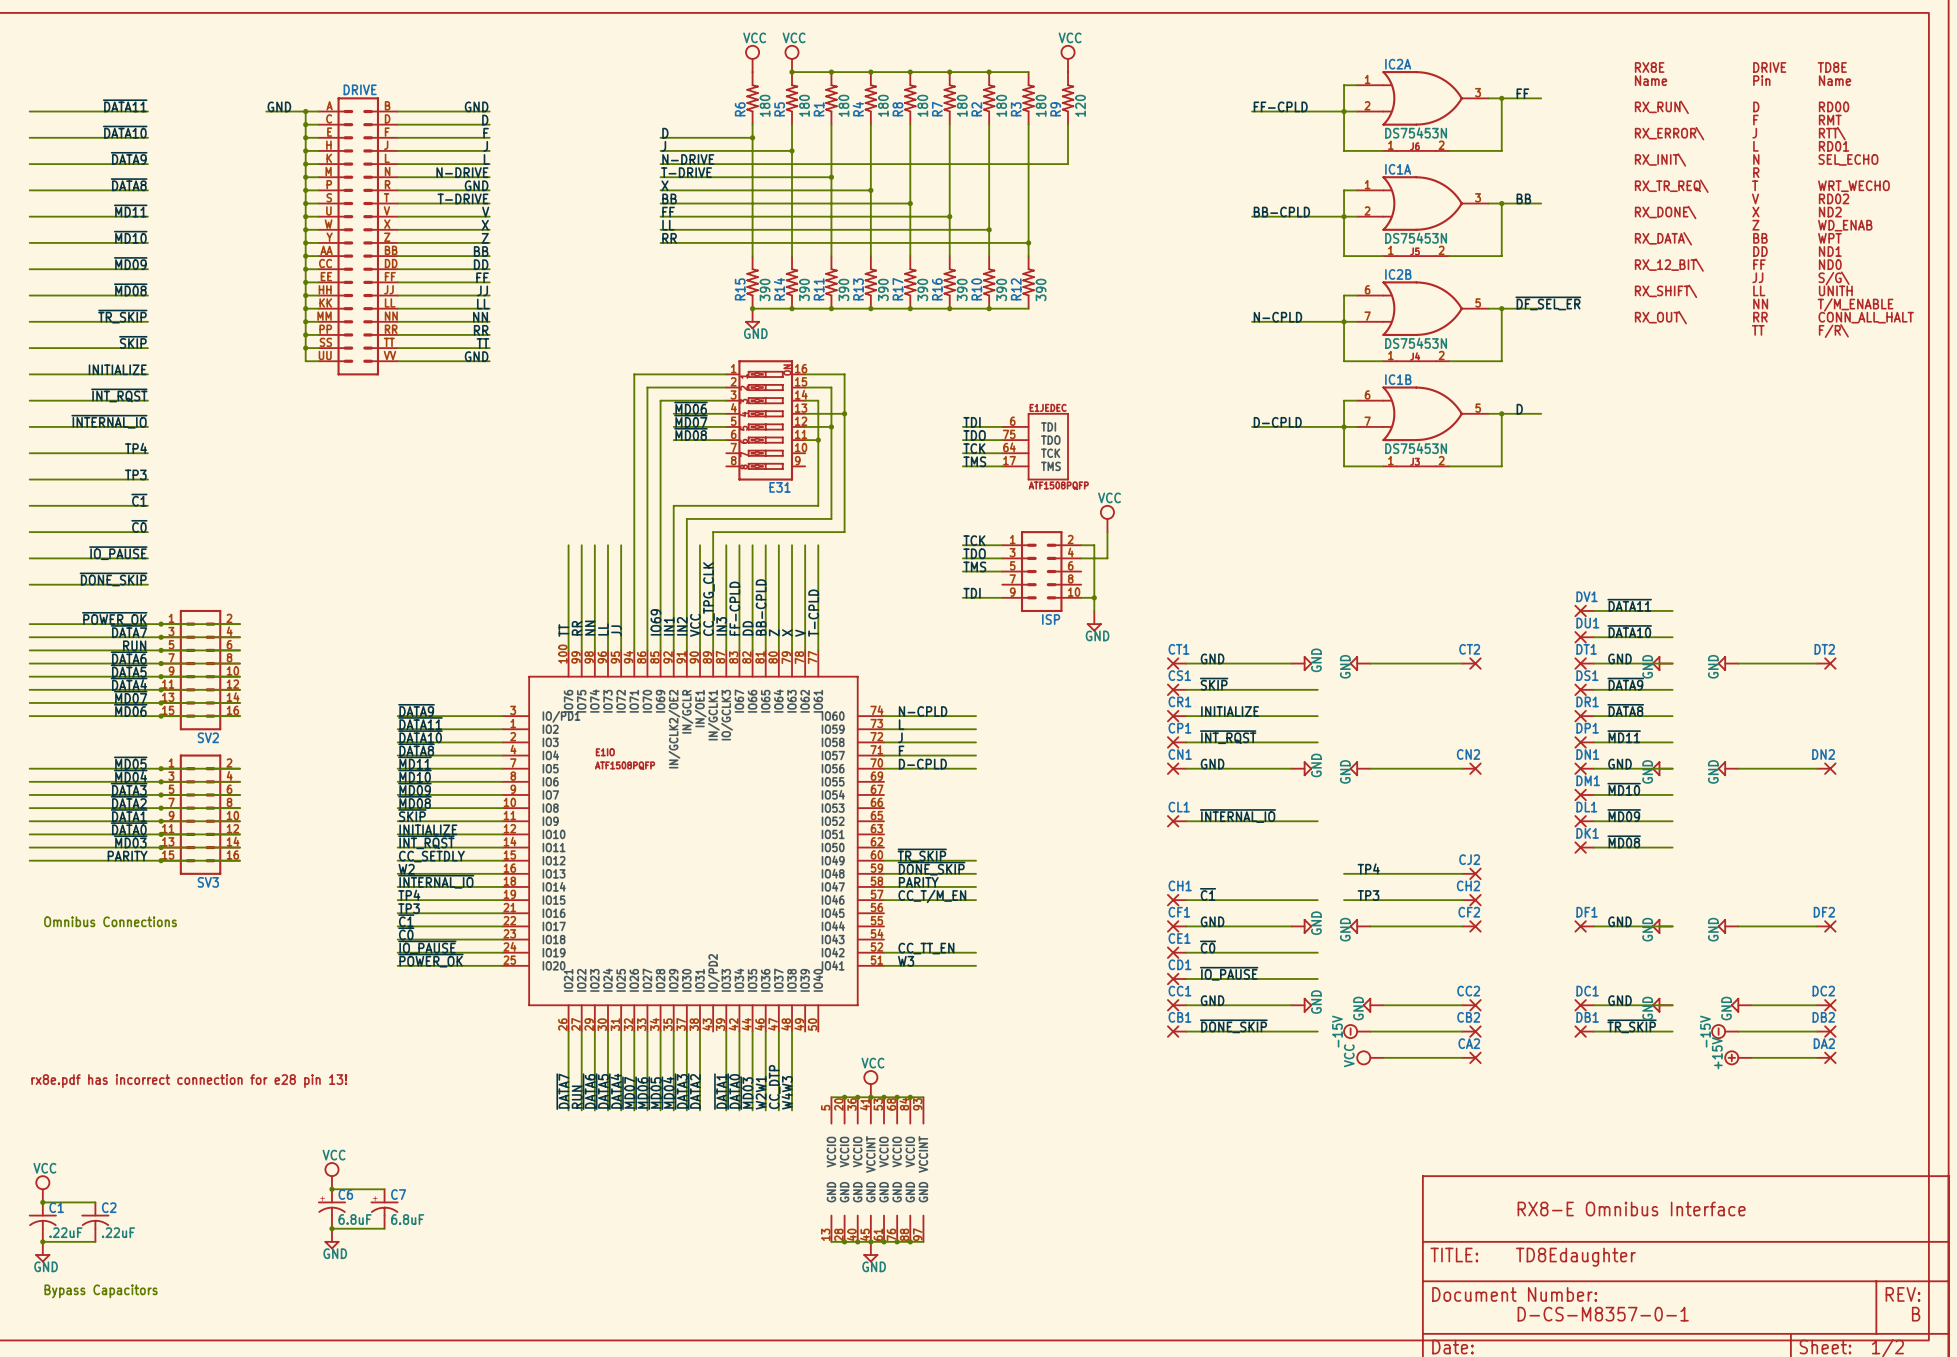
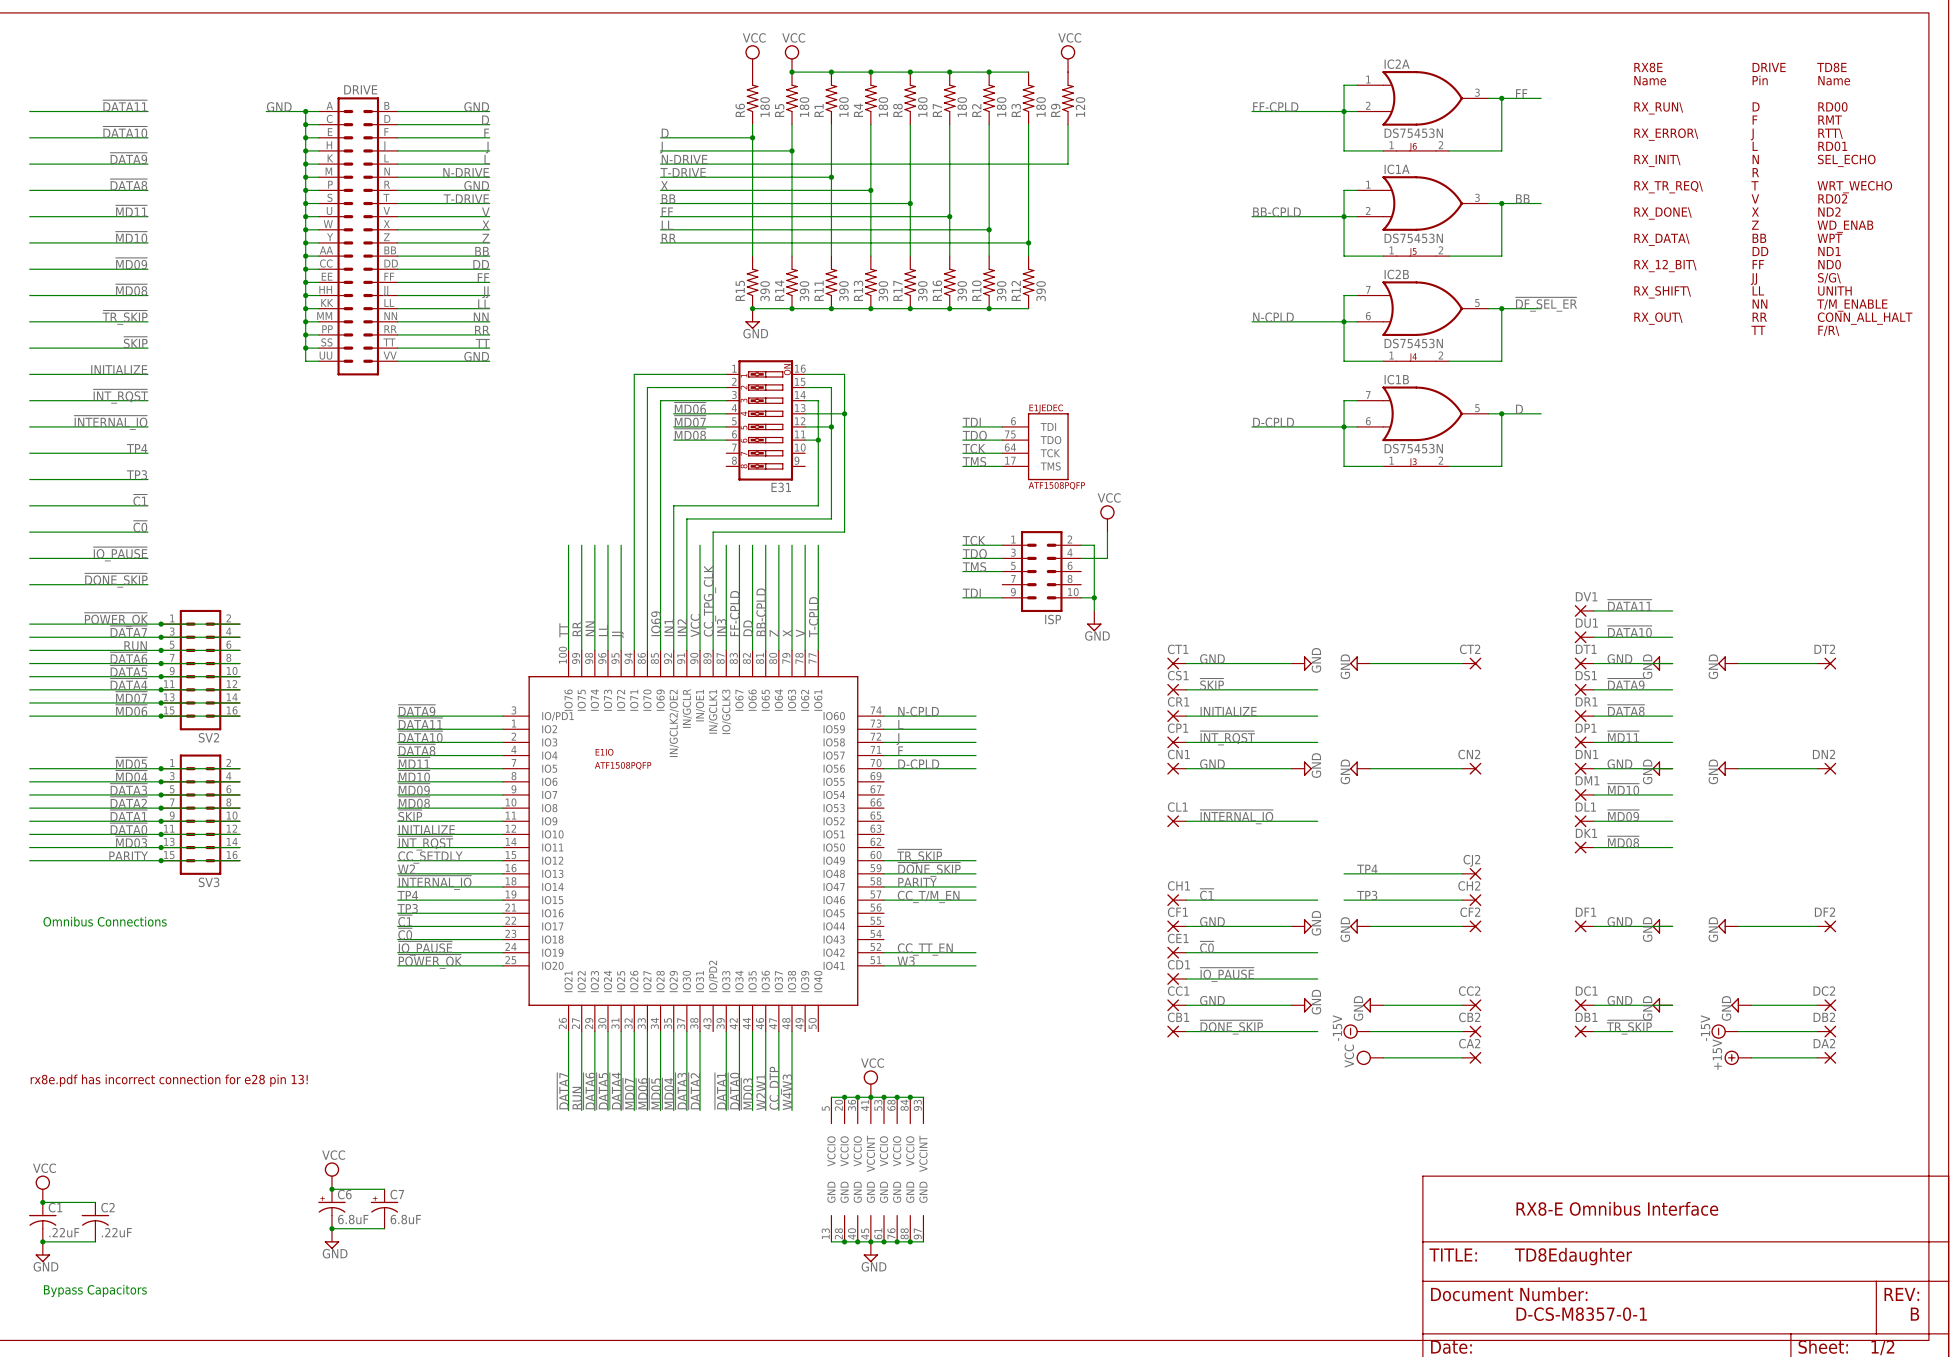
IC2B symbol: [1357, 281, 1489, 337] -> [1357, 281, 1489, 337]
IC1B symbol: [1357, 386, 1489, 442] -> [1357, 386, 1489, 442]

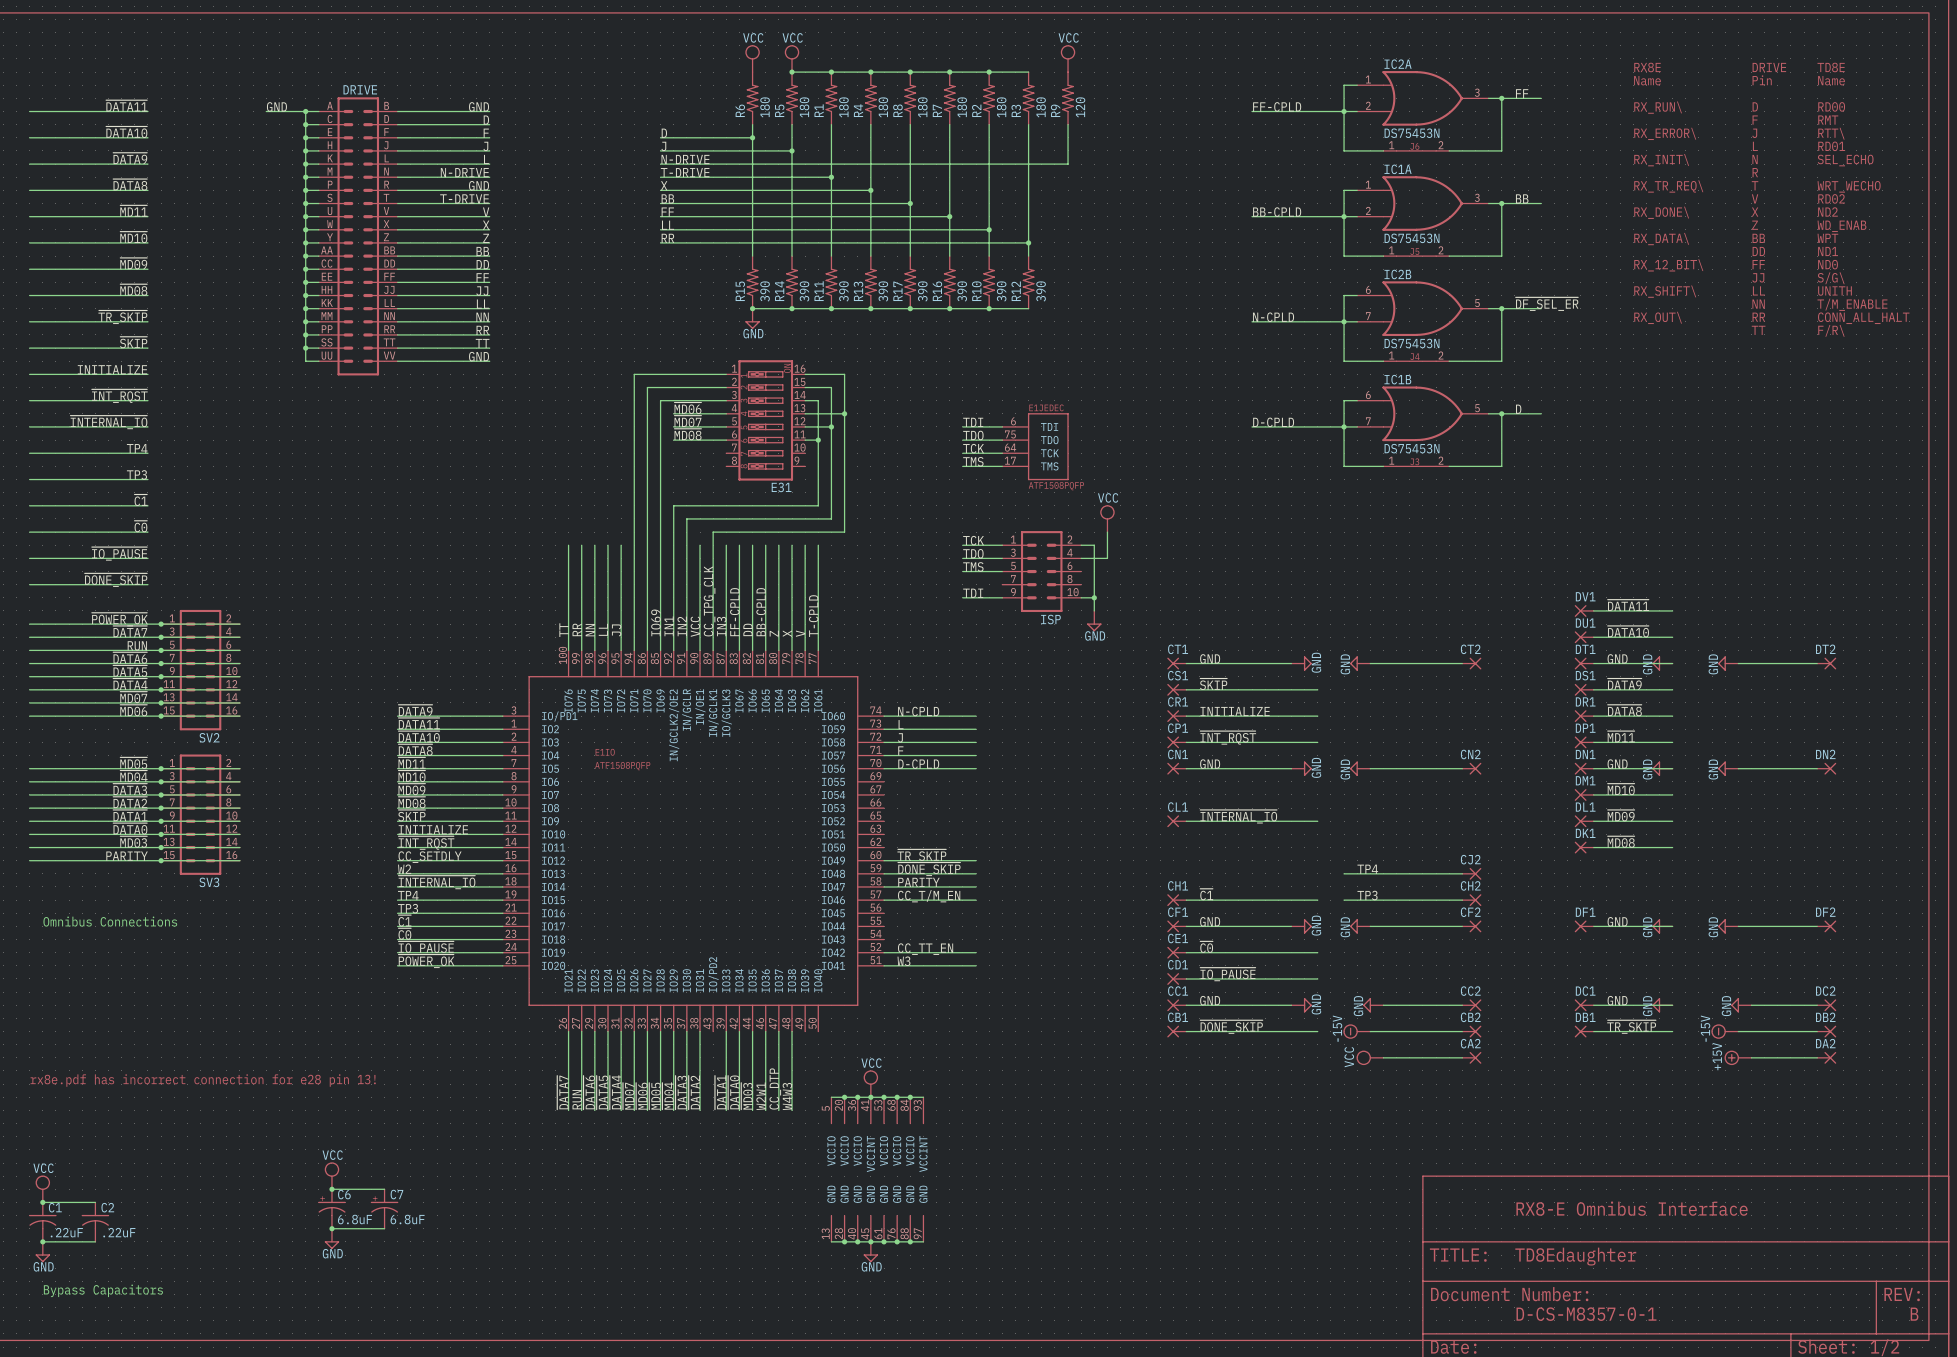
IC2B symbol: [1357, 281, 1489, 337] -> [1357, 281, 1489, 337]
IC1B symbol: [1357, 386, 1489, 442] -> [1357, 386, 1489, 442]

